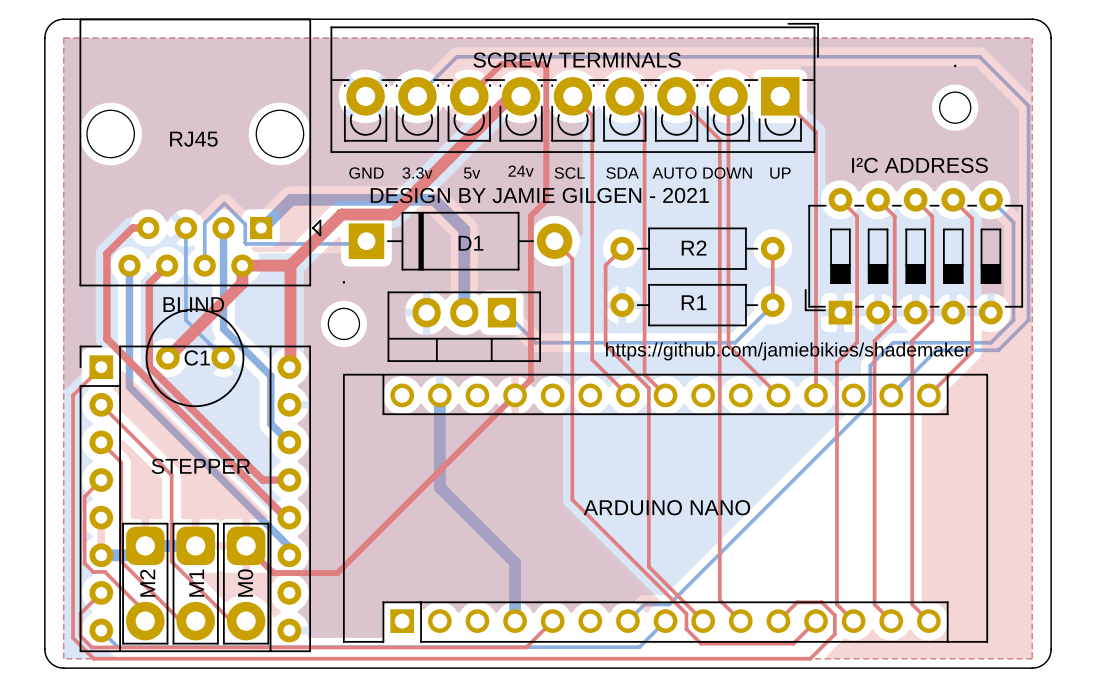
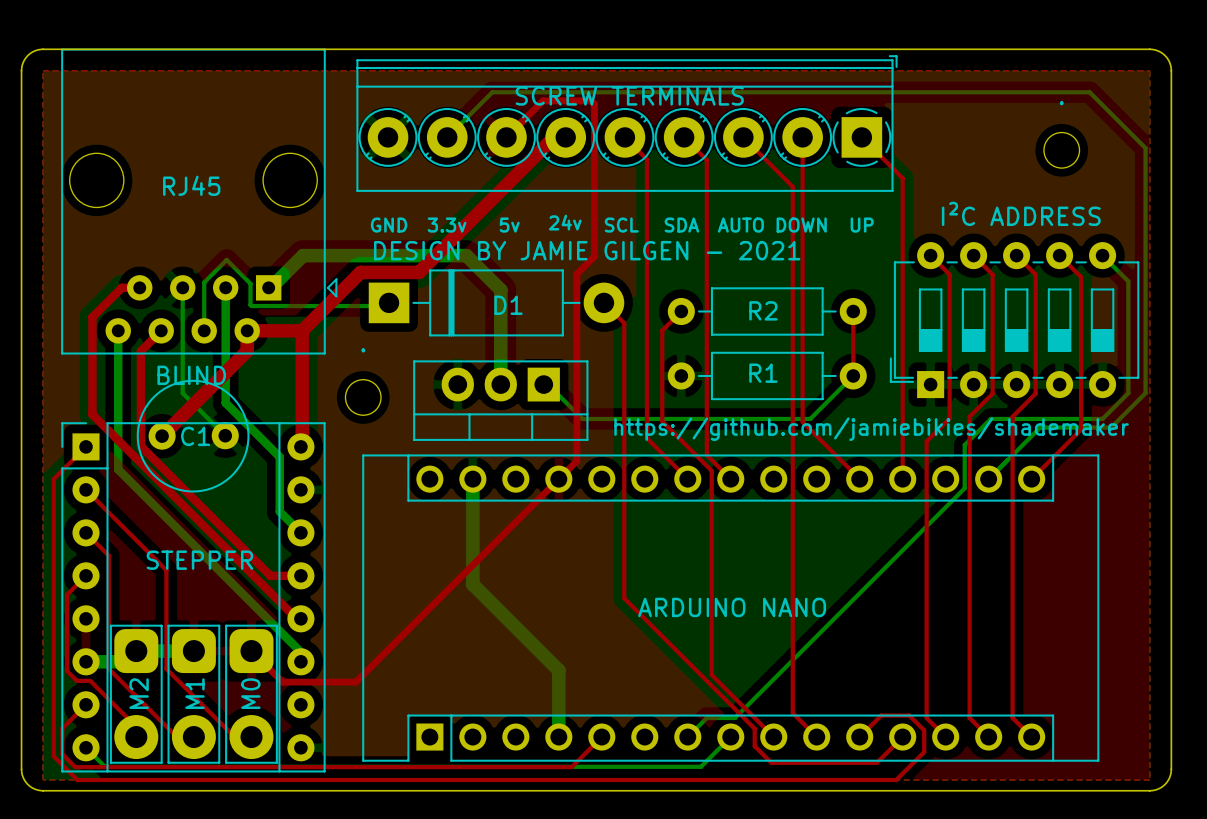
part footprint: [330, 22, 819, 153] -> [356, 55, 898, 192]

